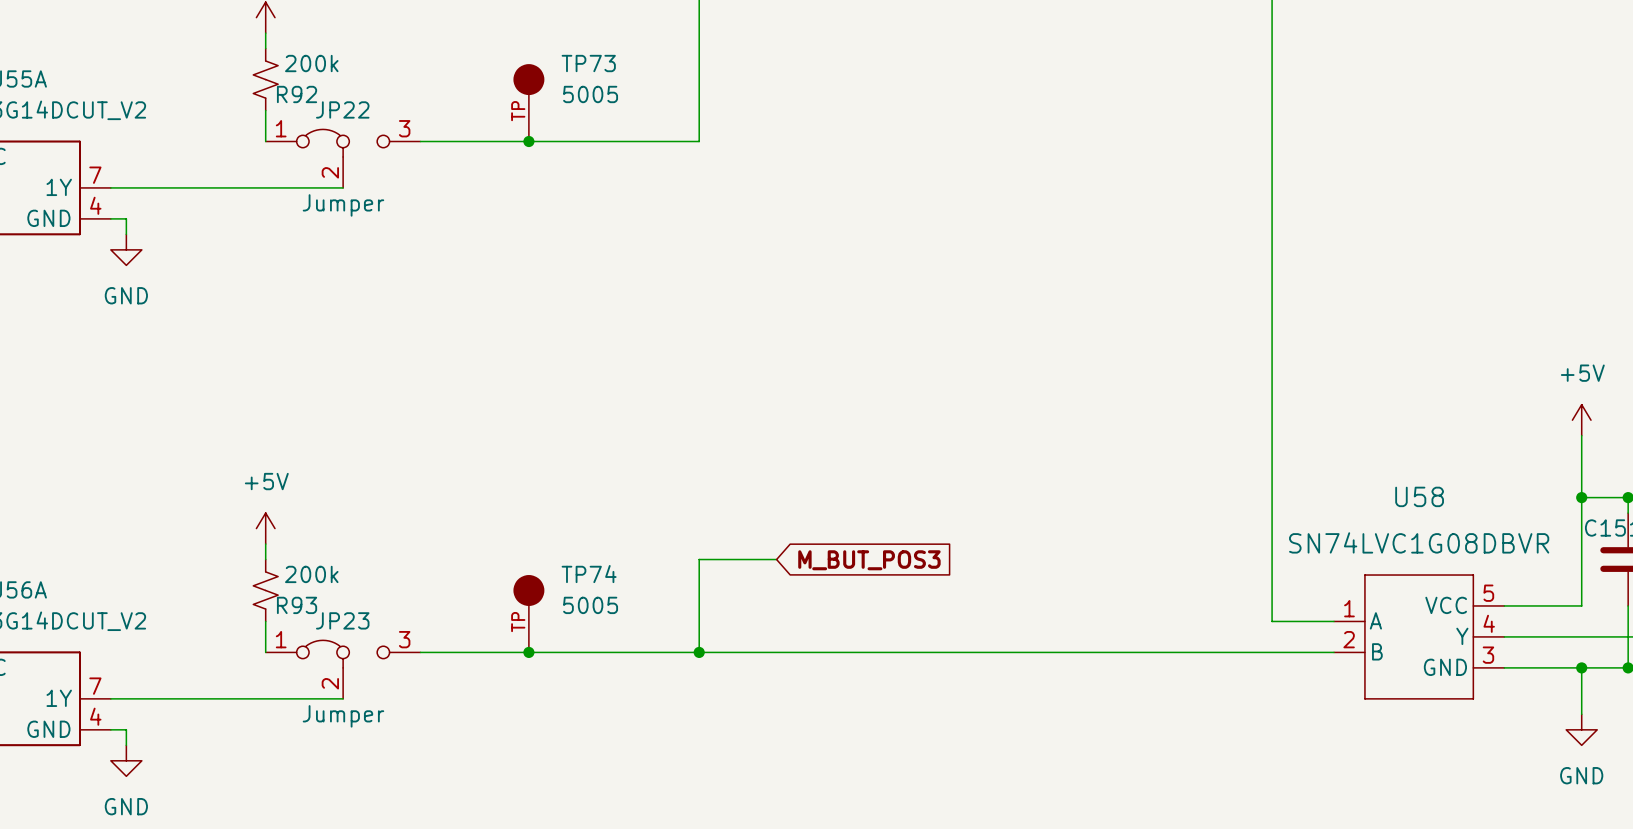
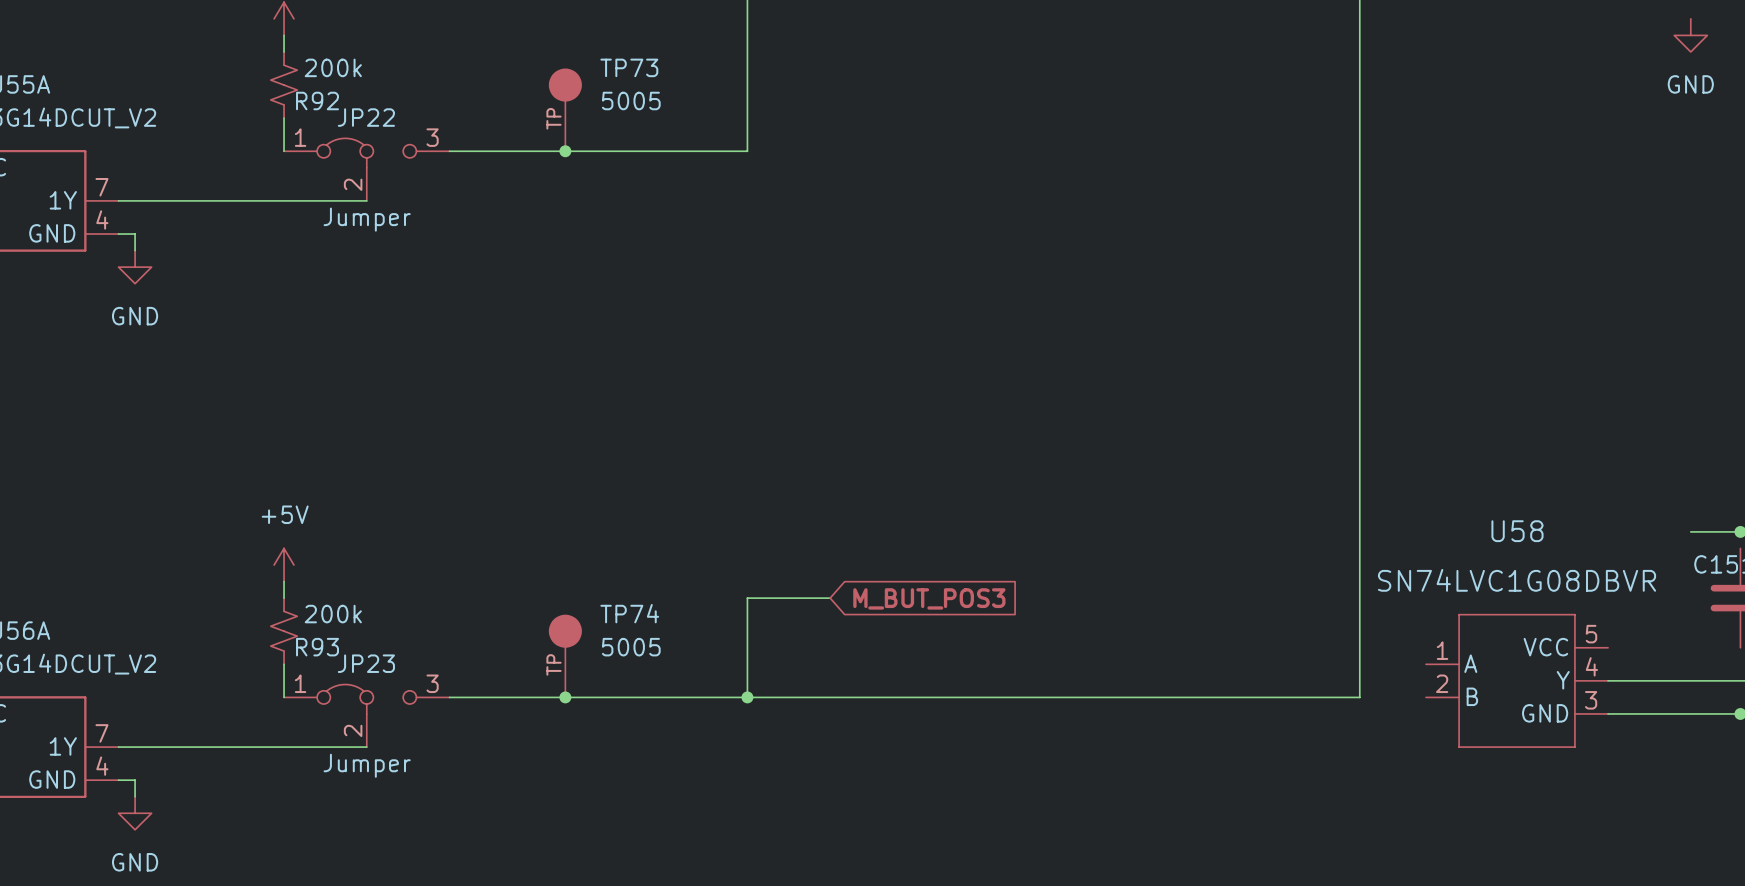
power symbol: none -> GND (1690, 35)
power symbol: +5V (1581, 420) -> none
wire: (1581, 435) (1581, 605) (1504, 605) -> none
junction: (1581, 497) -> none
wire: (1628, 497) (1628, 513) -> none
wire: (1628, 605) (1628, 667) -> none
wire: (1272, 621) (1333, 621) -> (1359, 664) (1359, 697)
wire: (1272, 652) (1333, 652) -> none
wire: (1581, 667) (1581, 714) -> none
junction: (1581, 667) -> none
power symbol: GND (1581, 729) -> none

